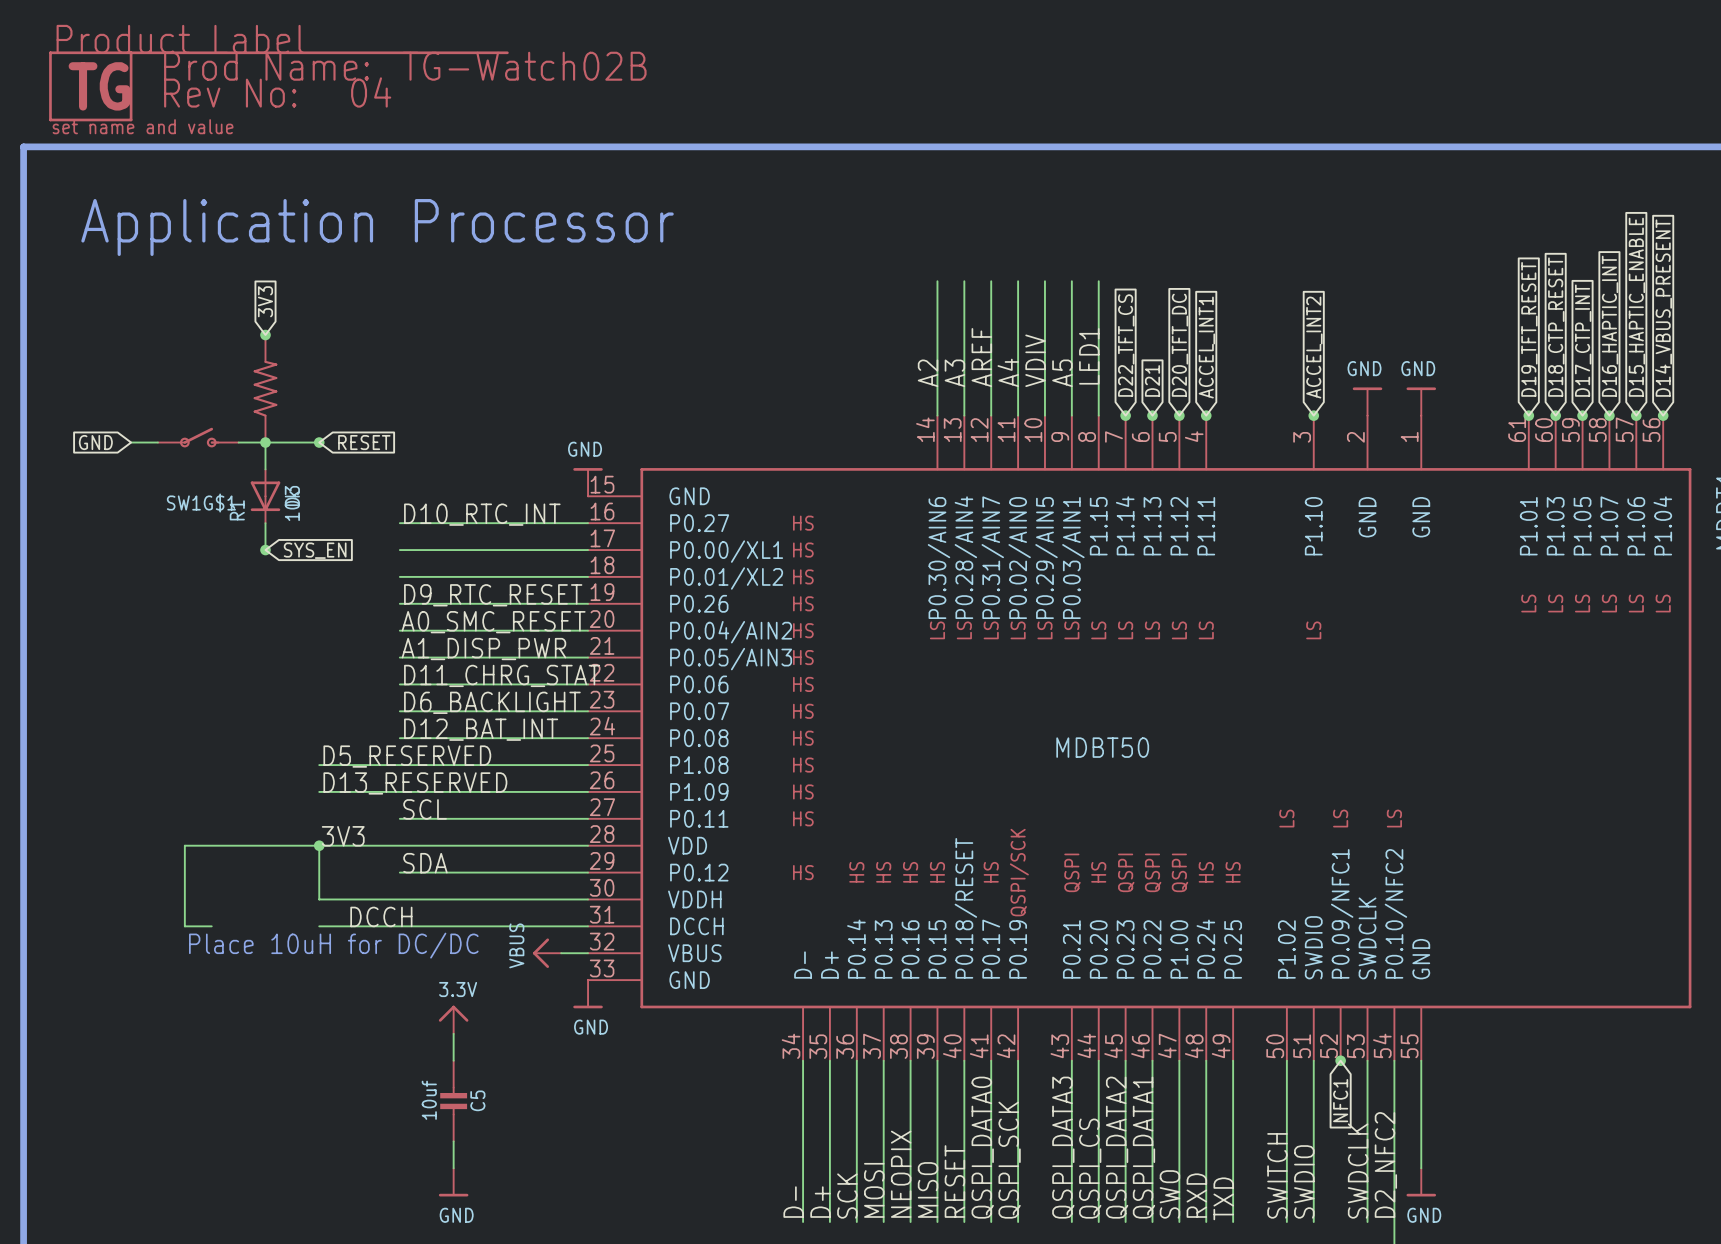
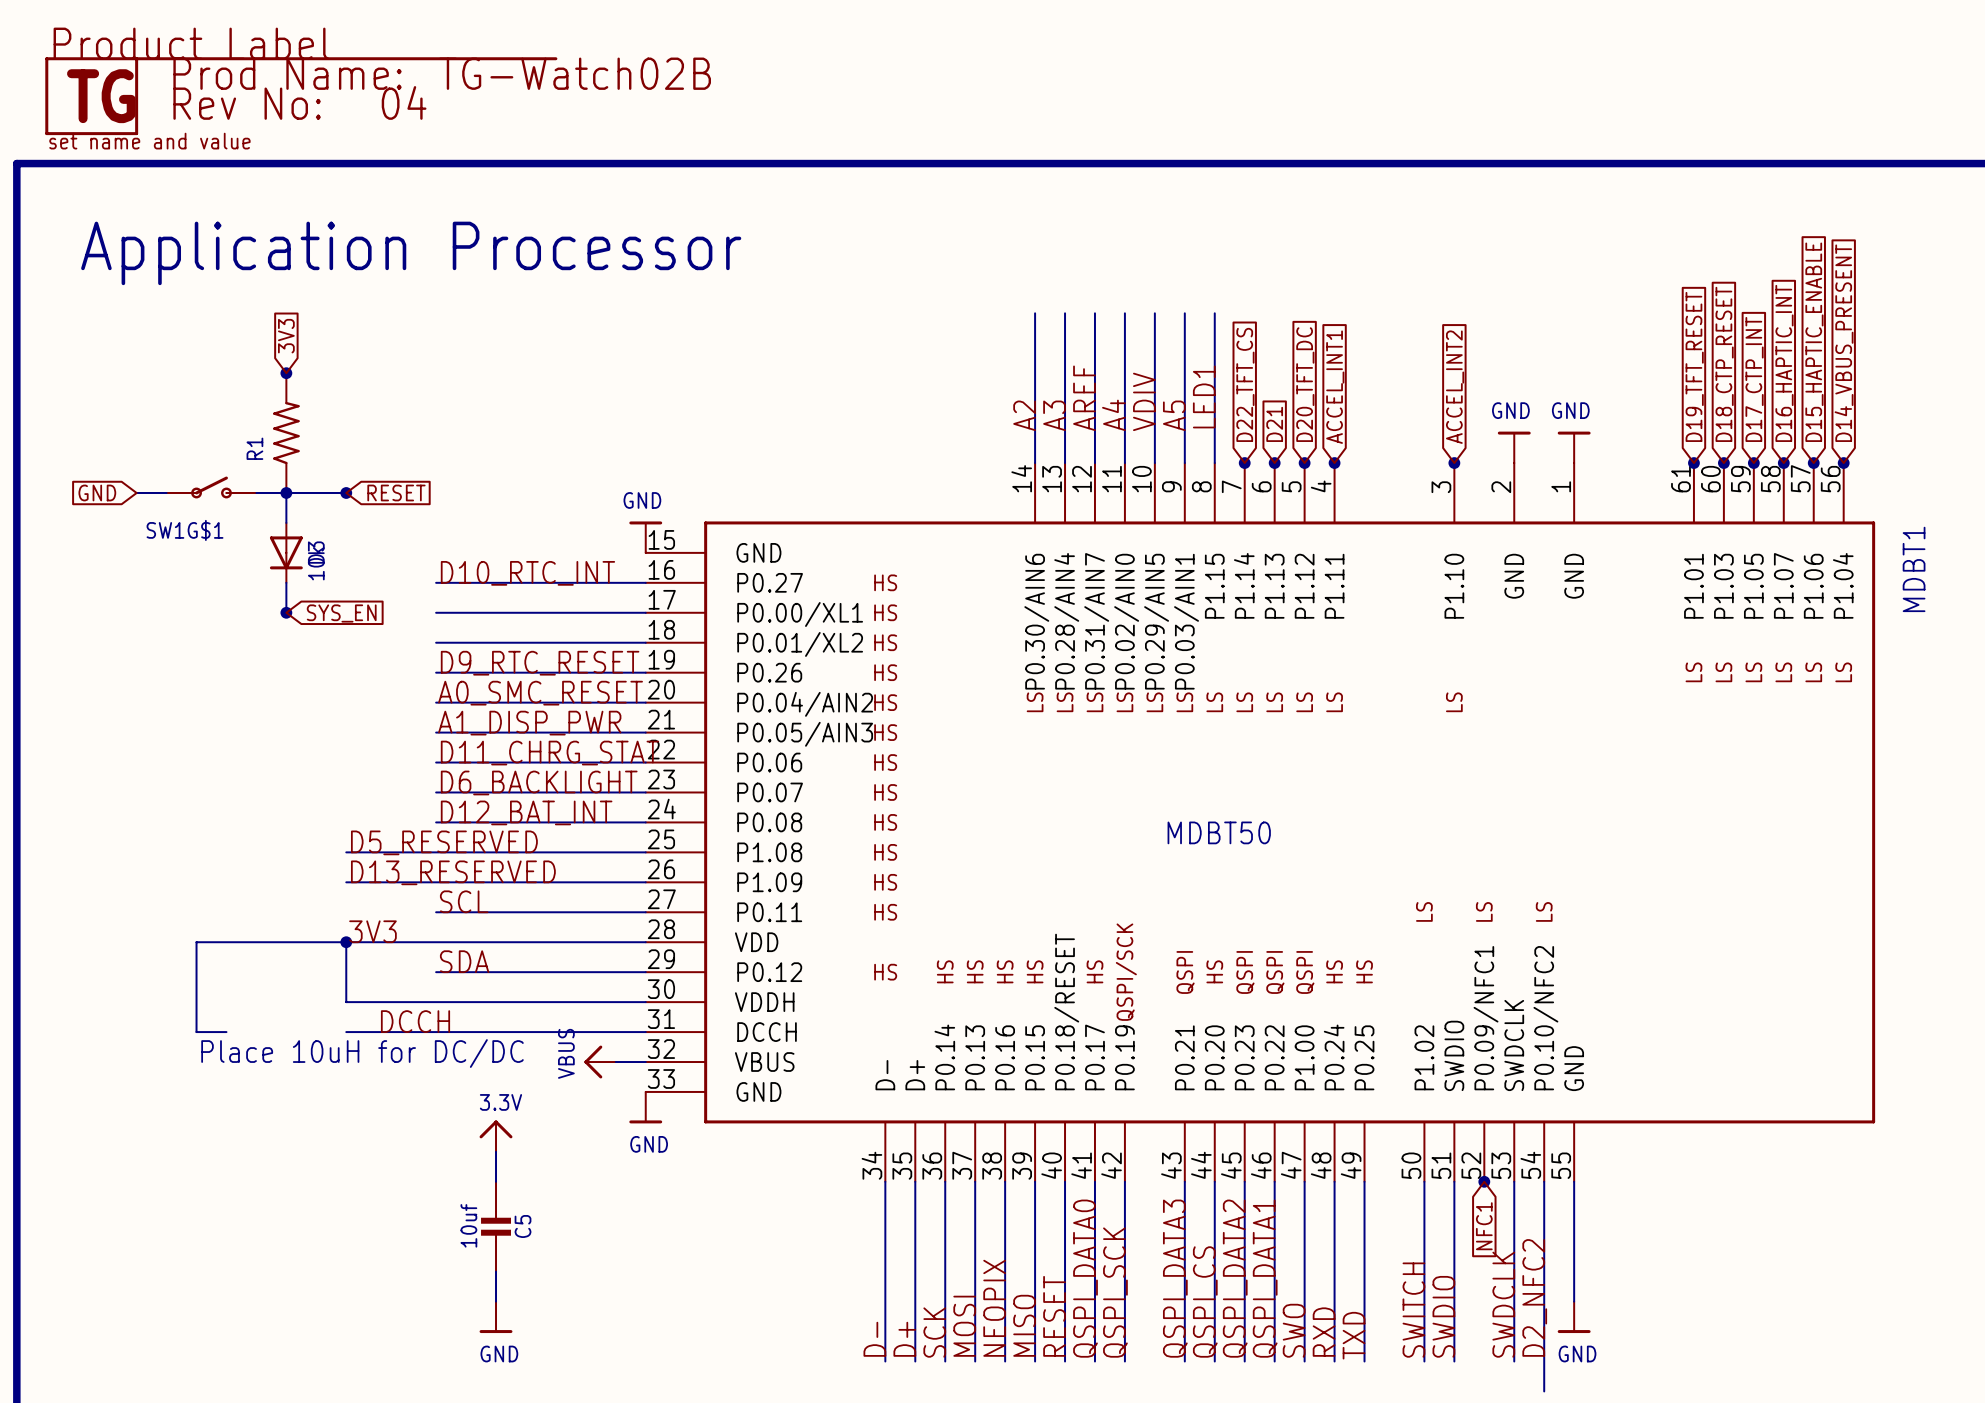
SW1G$1 name position: SW1G$1 (201, 503) -> SW1G$1 (185, 530)
R1 name position: R1 (237, 510) -> R1 (254, 448)

